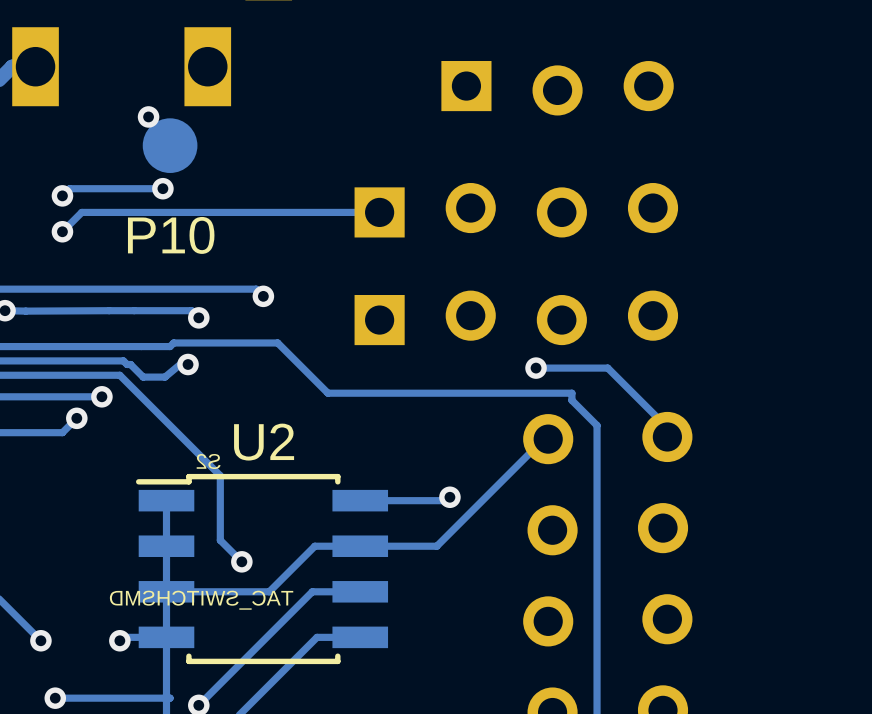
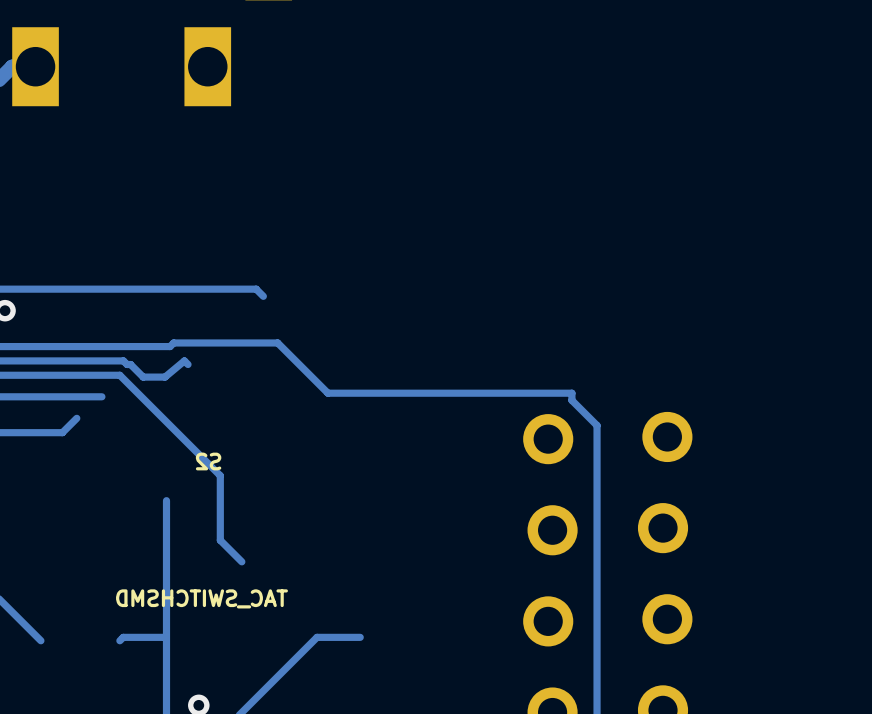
part: (557, 88) -> none
via: (148, 116) -> none
P10: (170, 145) -> none
track: (162, 188) (69, 188) (62, 195) -> none
via: (162, 188) -> none
via: (62, 195) -> none
part: (516, 210) -> none
track: (379, 212) (81, 212) (62, 231) -> none
via: (62, 231) -> none
via: (263, 296) -> none
track: (5, 310) (191, 310) (198, 317) -> none
via: (198, 317) -> none
part: (516, 317) -> none
via: (188, 364) -> none
track: (536, 368) (607, 368) (667, 427) (667, 436) -> none
via: (536, 368) -> none
via: (101, 396) -> none
via: (76, 418) -> none
track: (550, 436) (543, 439) (436, 546) (314, 546) (269, 591) (166, 591) -> none
track: (449, 497) (446, 500) (360, 500) -> none
via: (449, 497) -> none
via: (241, 561) -> none
U2: (262, 569) -> none
track: (360, 591) (312, 591) (198, 705) -> none
via: (40, 640) -> none
via: (119, 640) -> none
via: (55, 698) -> none
track: (170, 698) (55, 698) -> none

